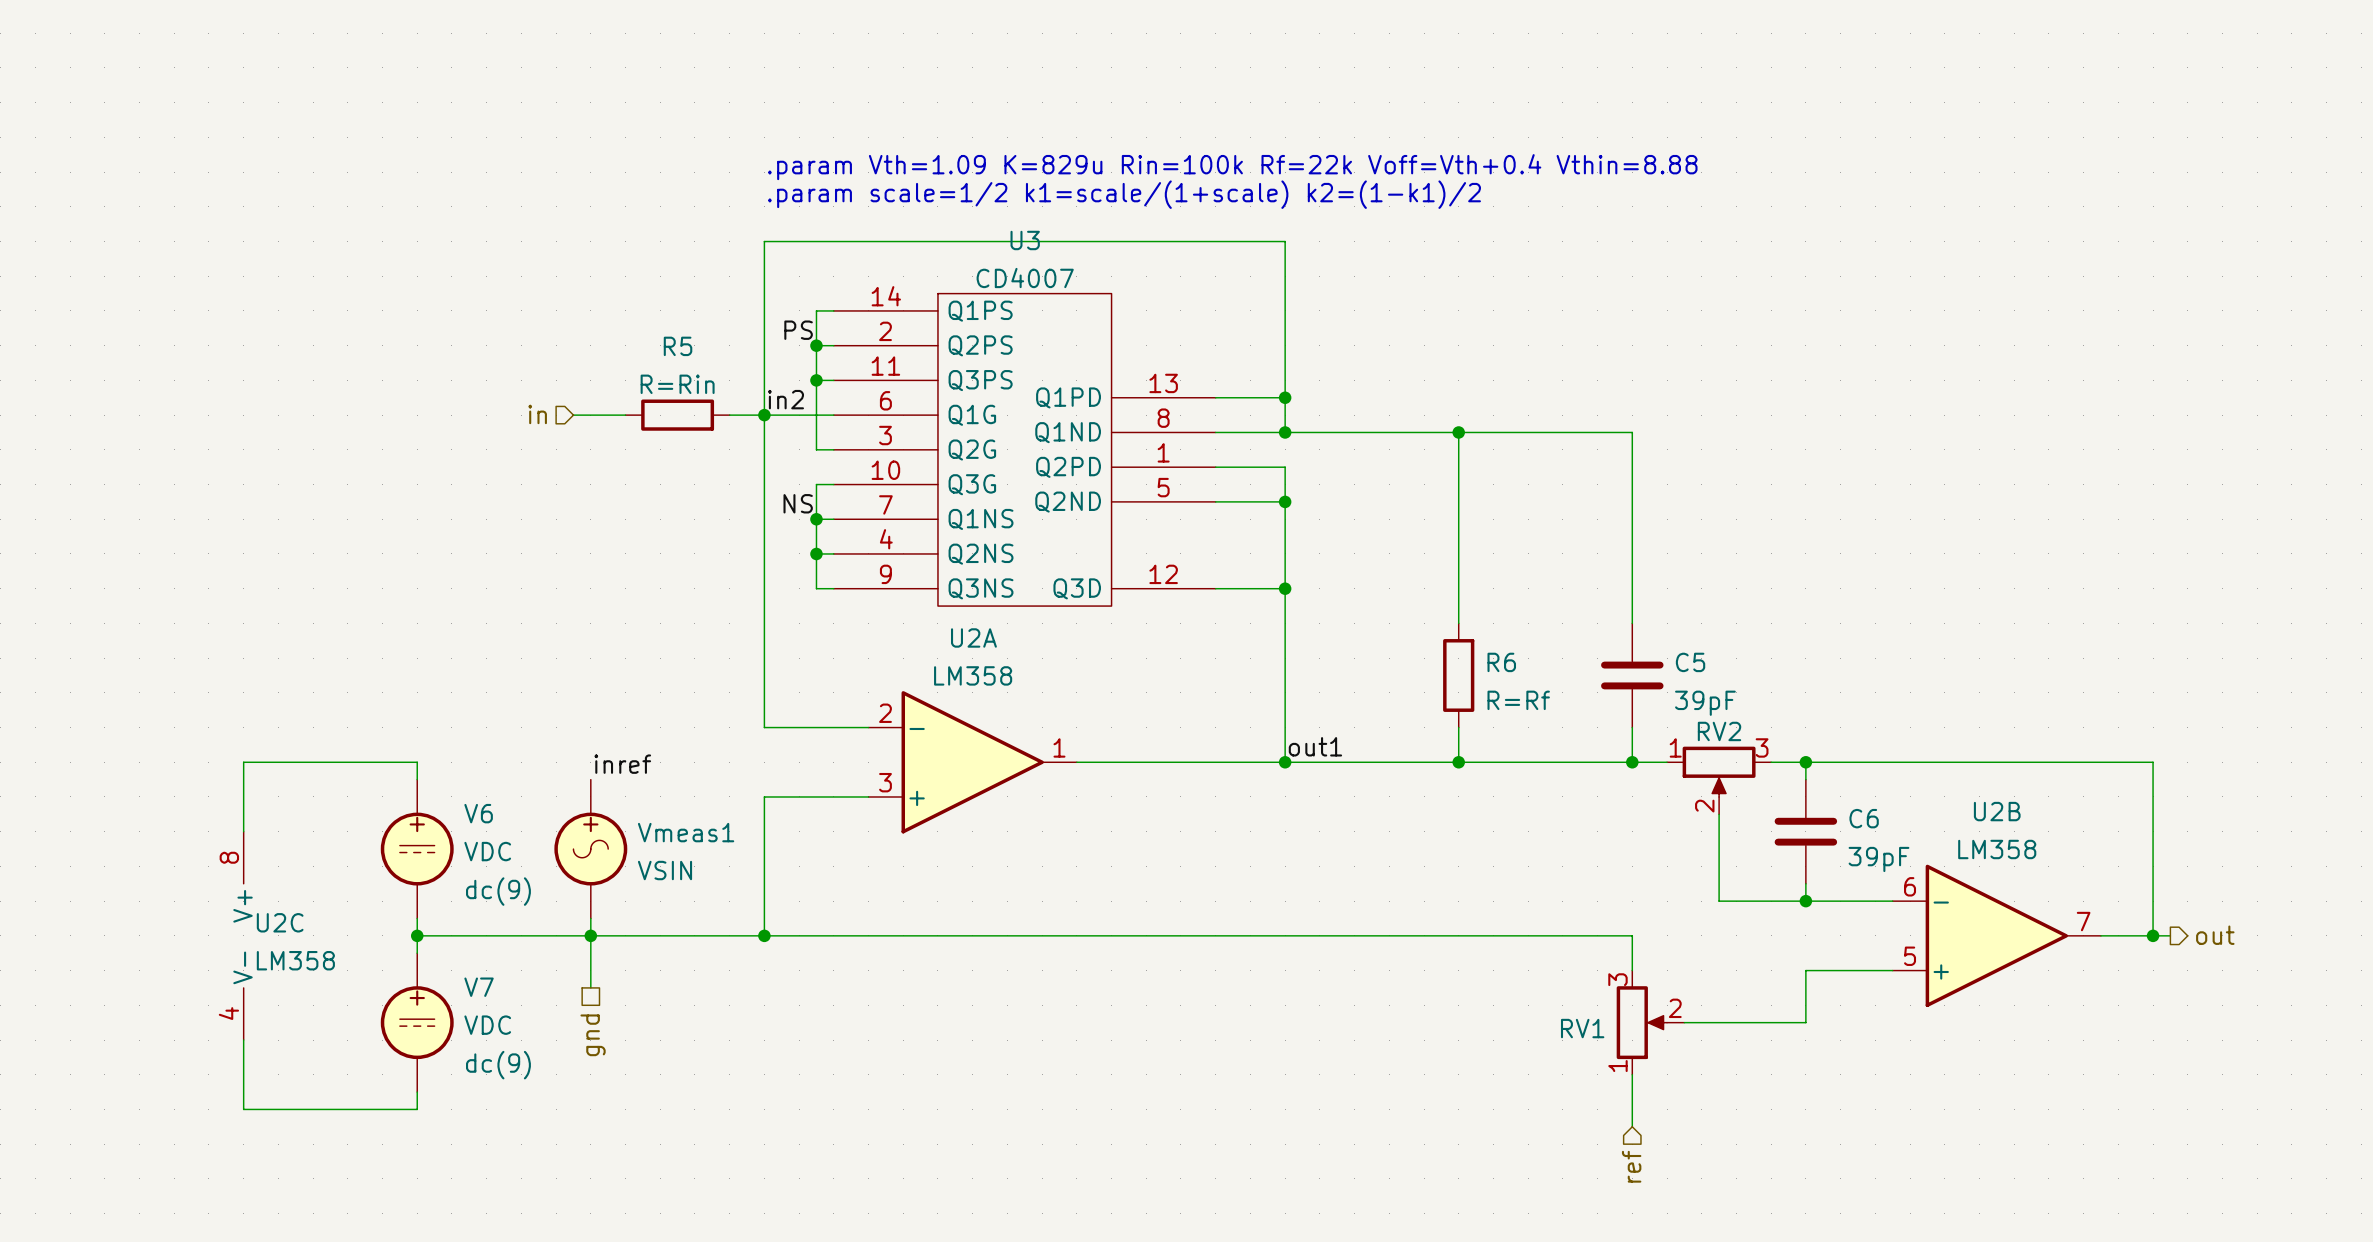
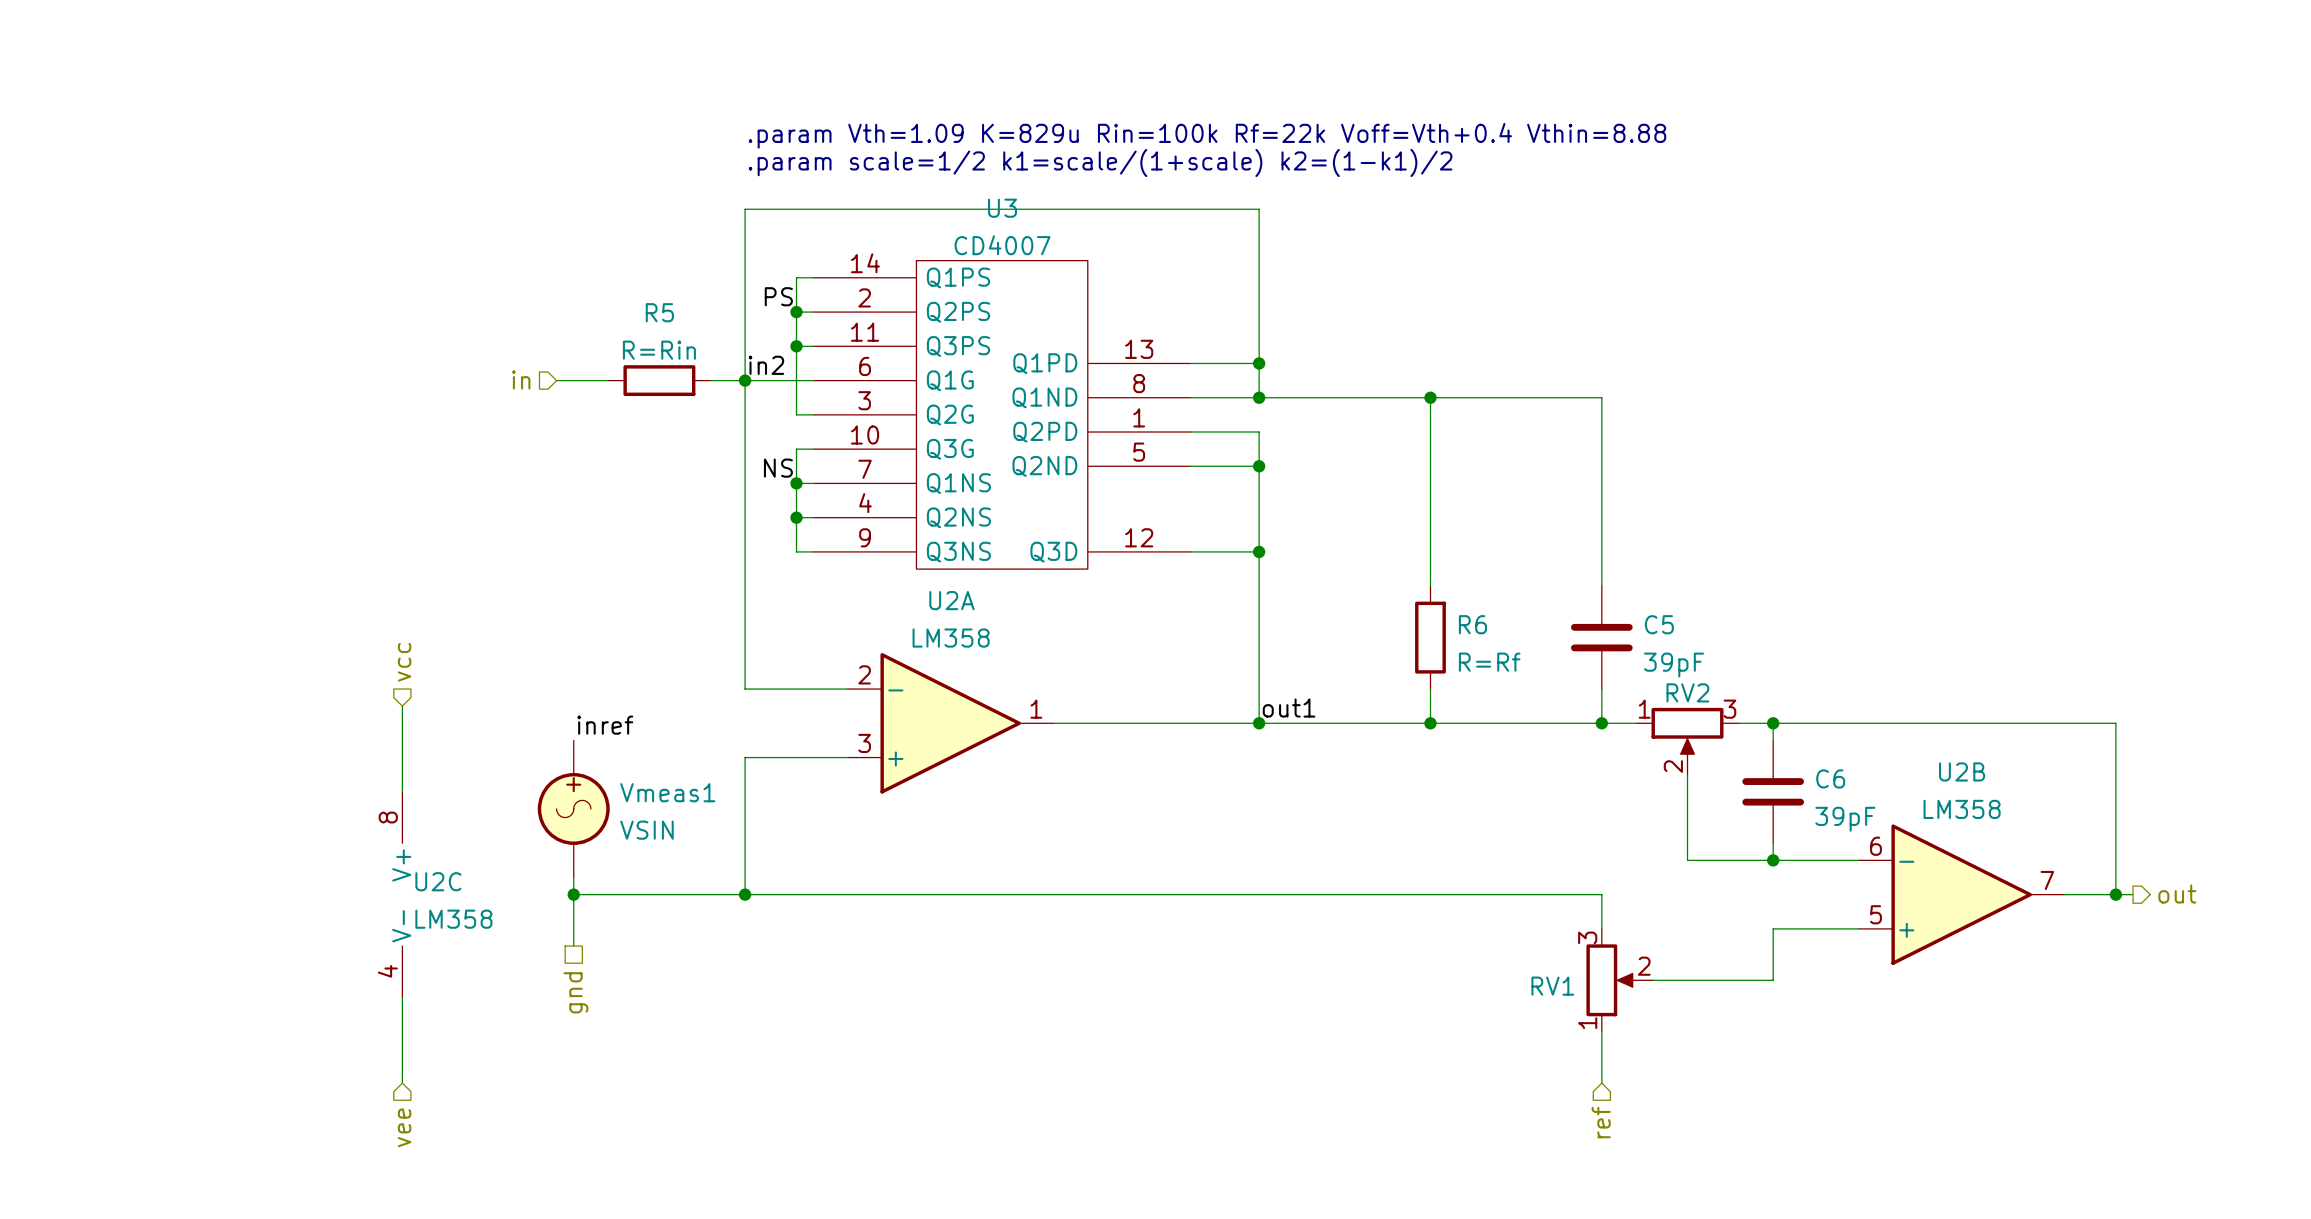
hierarchical label: none -> vcc (404, 662)
wire: (417, 762) (243, 762) (243, 831) -> (402, 723) (402, 706)
V6: VDC (417, 849) -> none
wire: (417, 918) (417, 953) -> none
U2C position: (243, 935) -> (402, 894)
wire: (417, 935) (590, 935) -> none
junction: (417, 935) -> none
V7: VDC (417, 1022) -> none
wire: (243, 1040) (243, 1109) (417, 1109) -> (402, 1083) (402, 1065)
hierarchical label: none -> vee (404, 1127)

